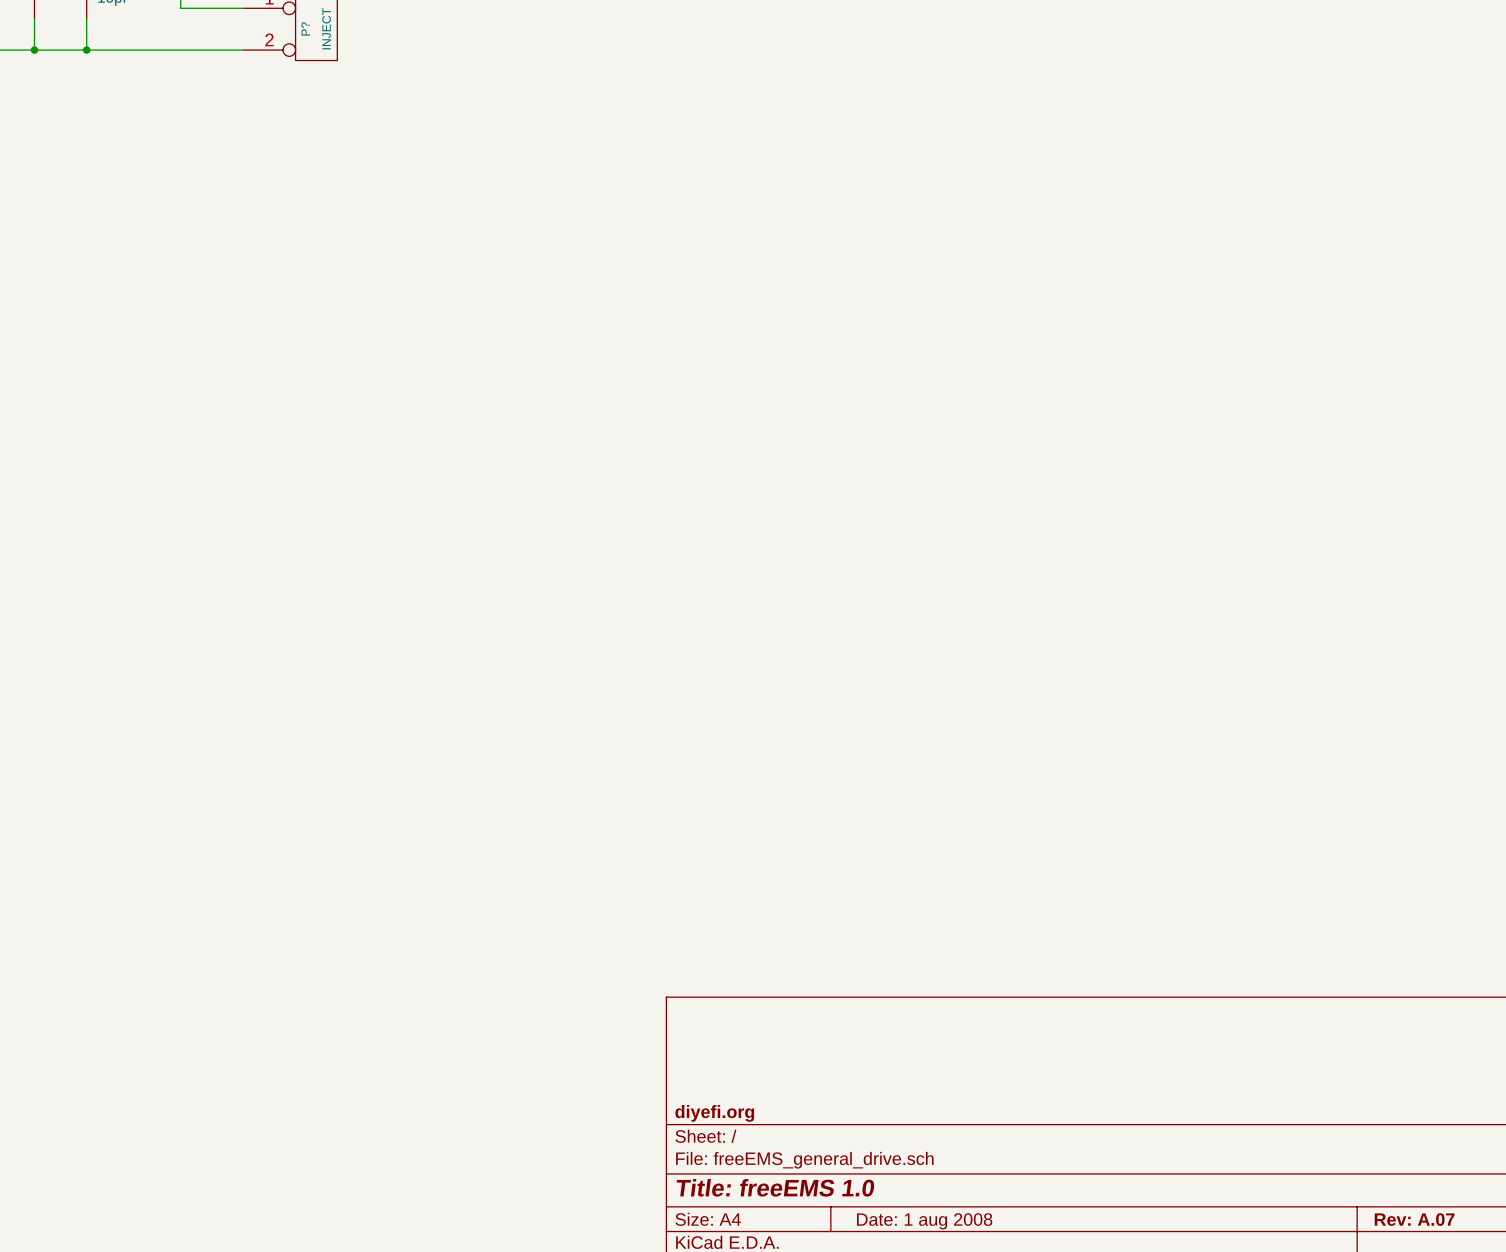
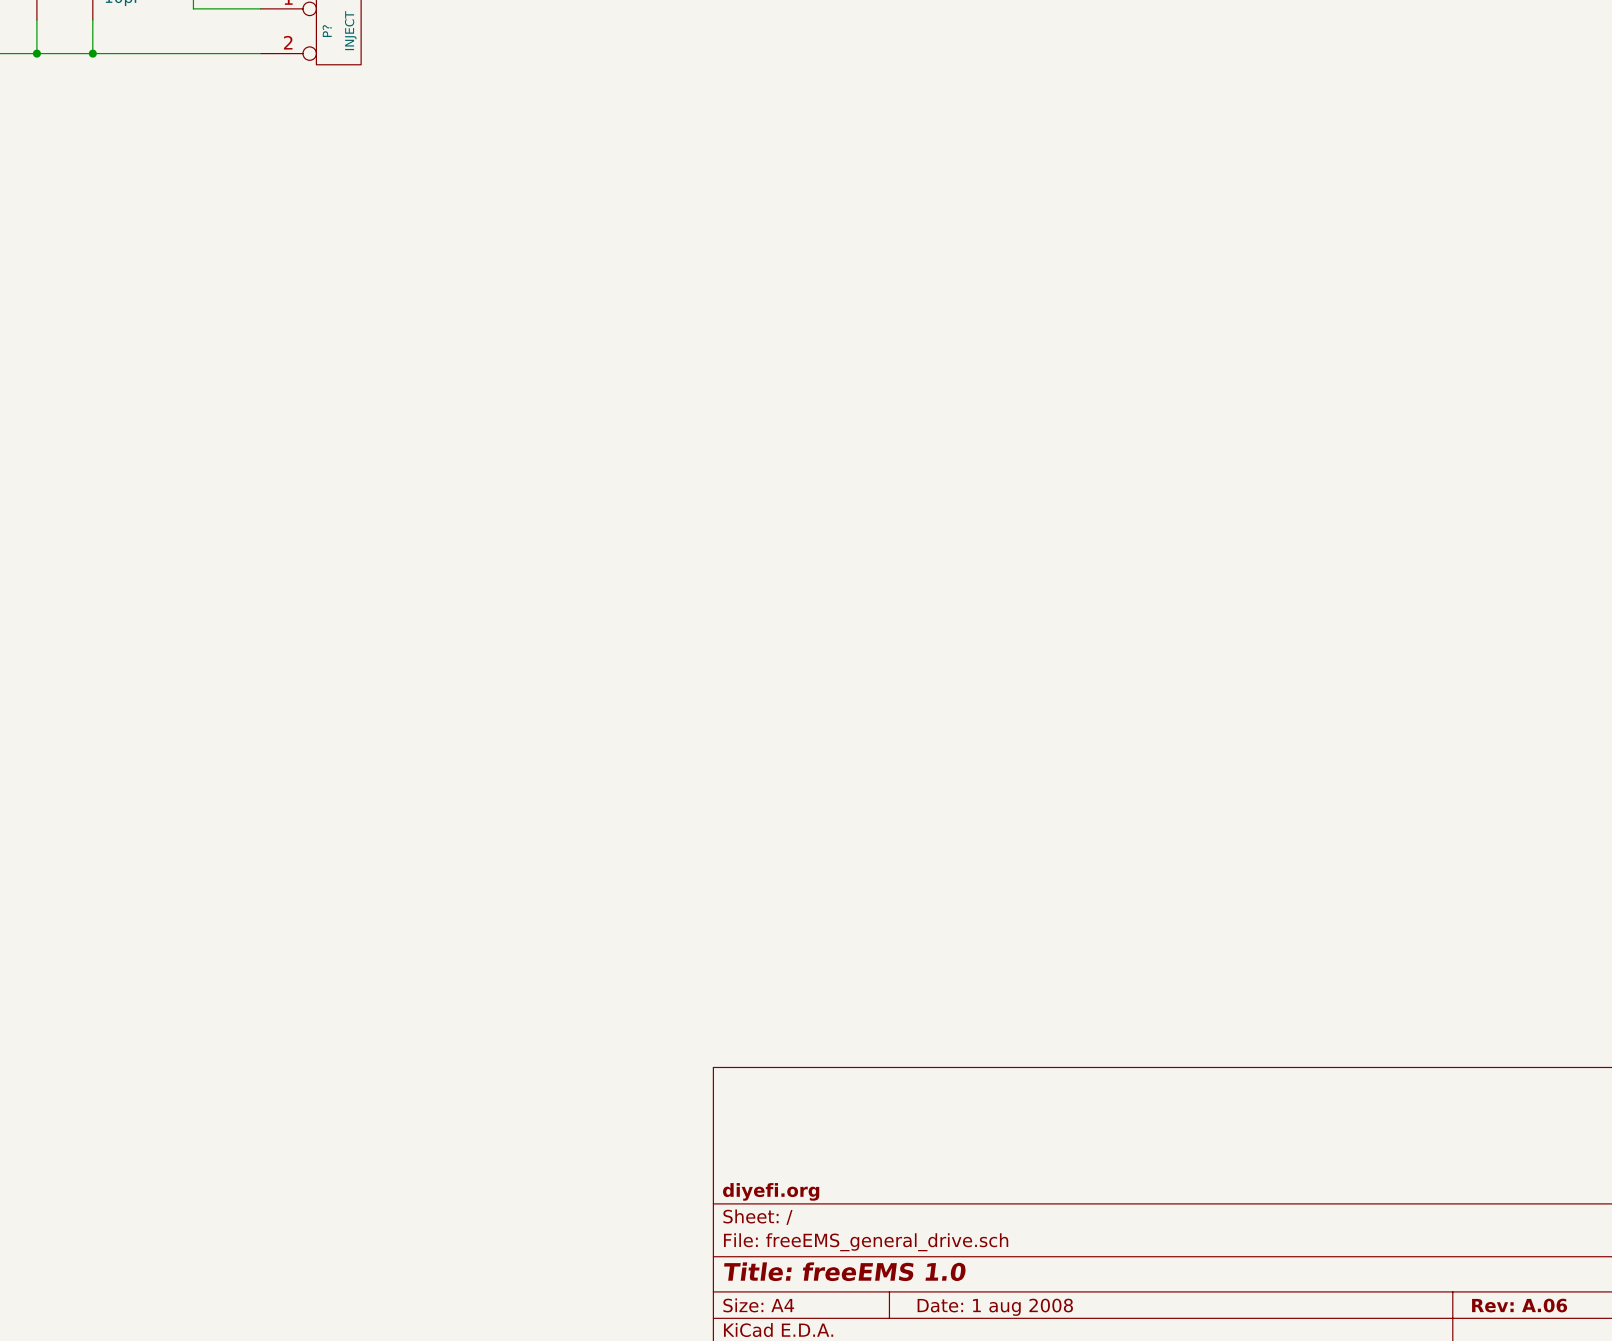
title block: Rev: A.07 (1414, 1219) -> Rev: A.06 (1519, 1305)

